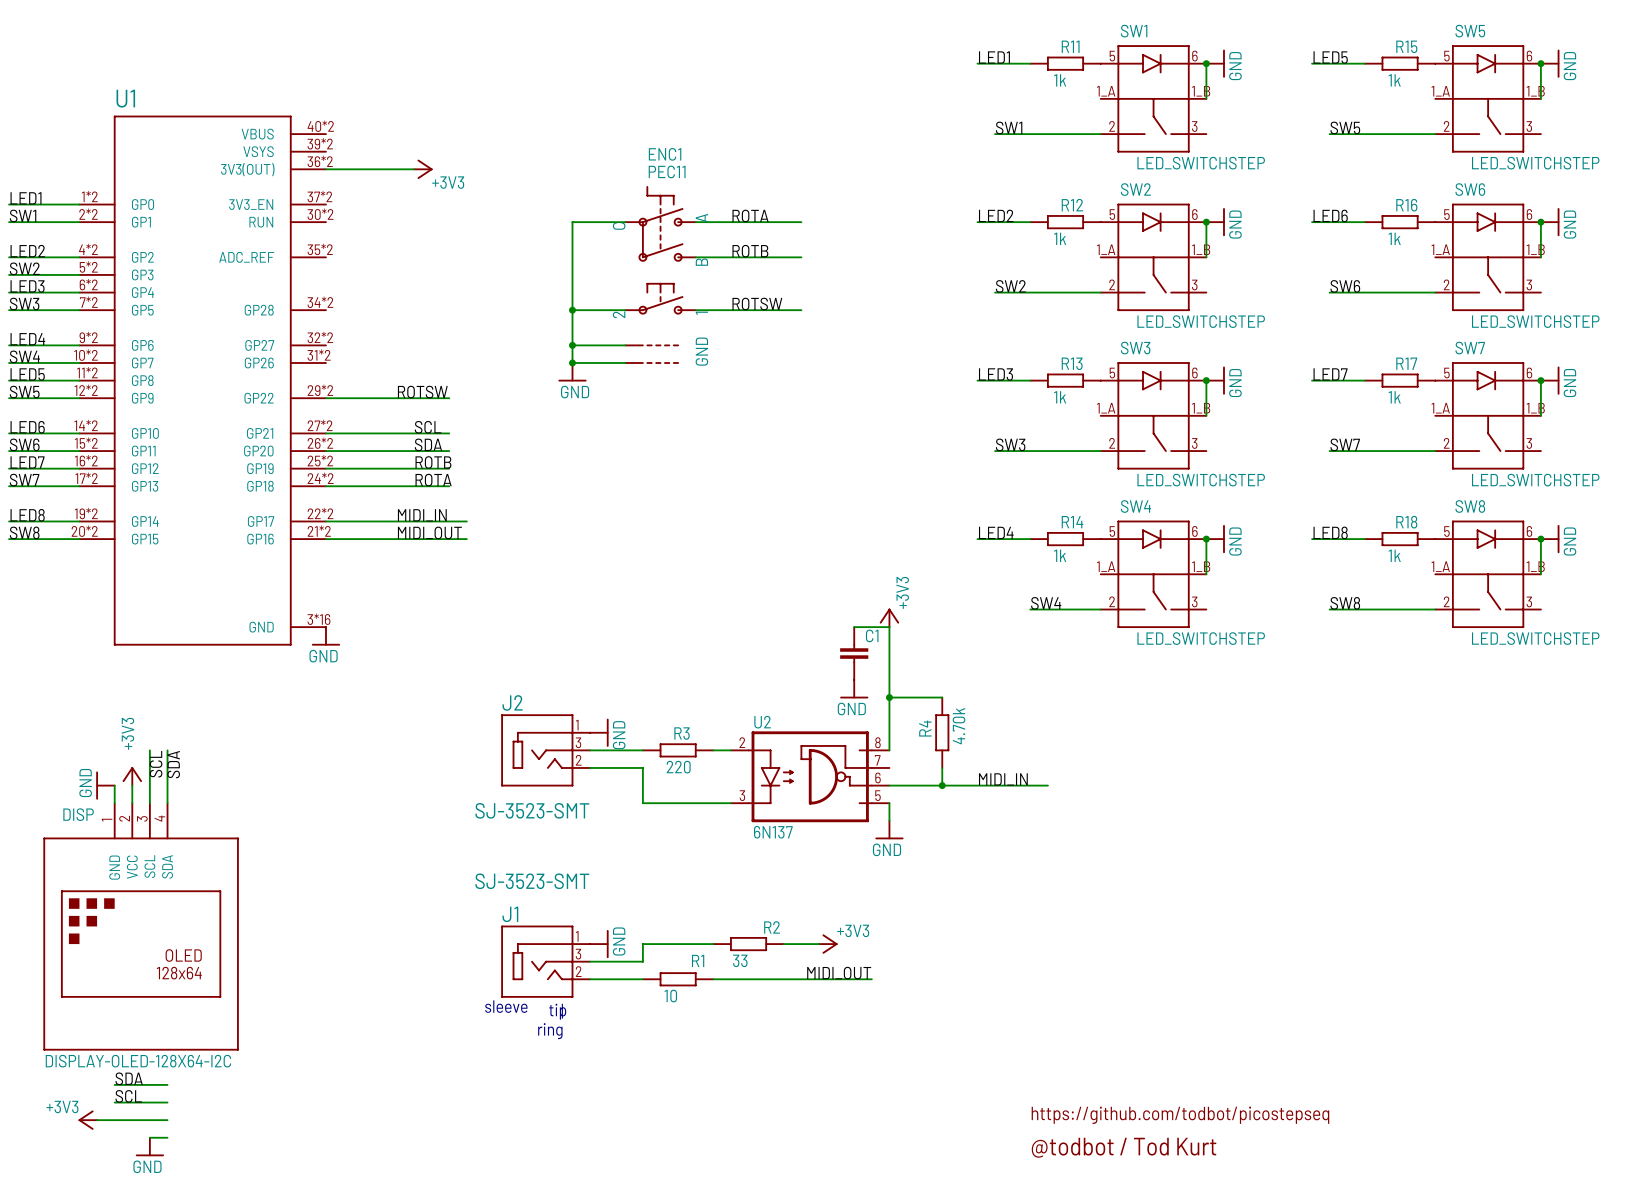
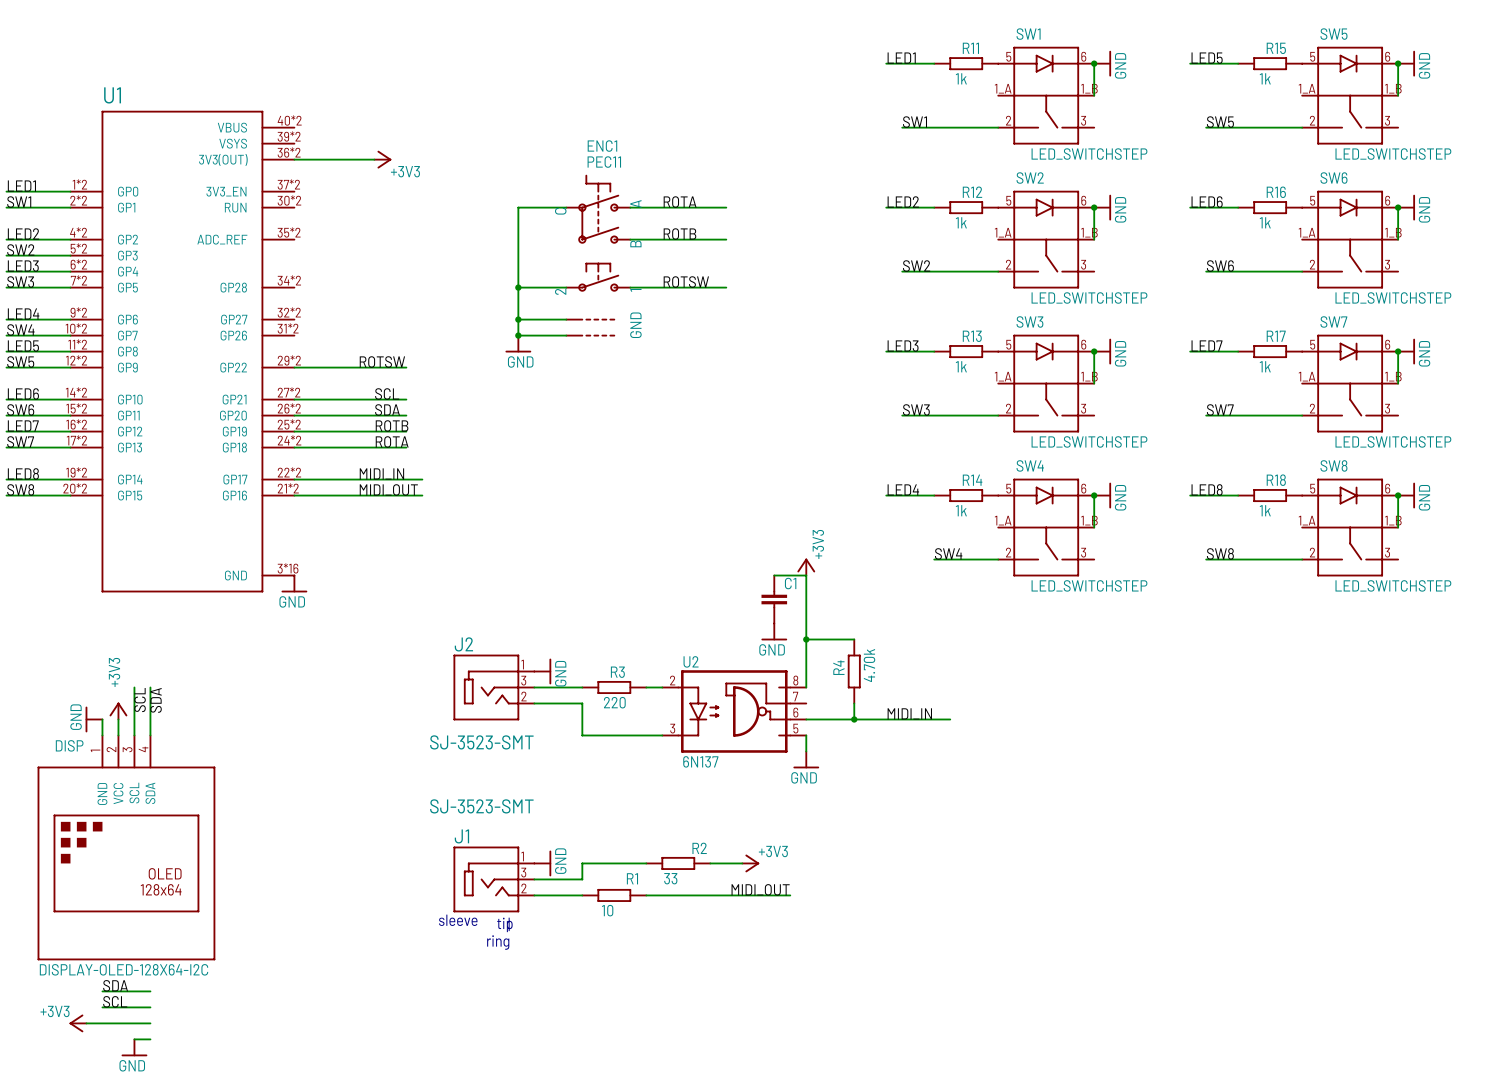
text: https://github.com/todbot/picostepseq (1180, 1115) -> none
text: @todbot / Tod Kurt (1124, 1147) -> none

